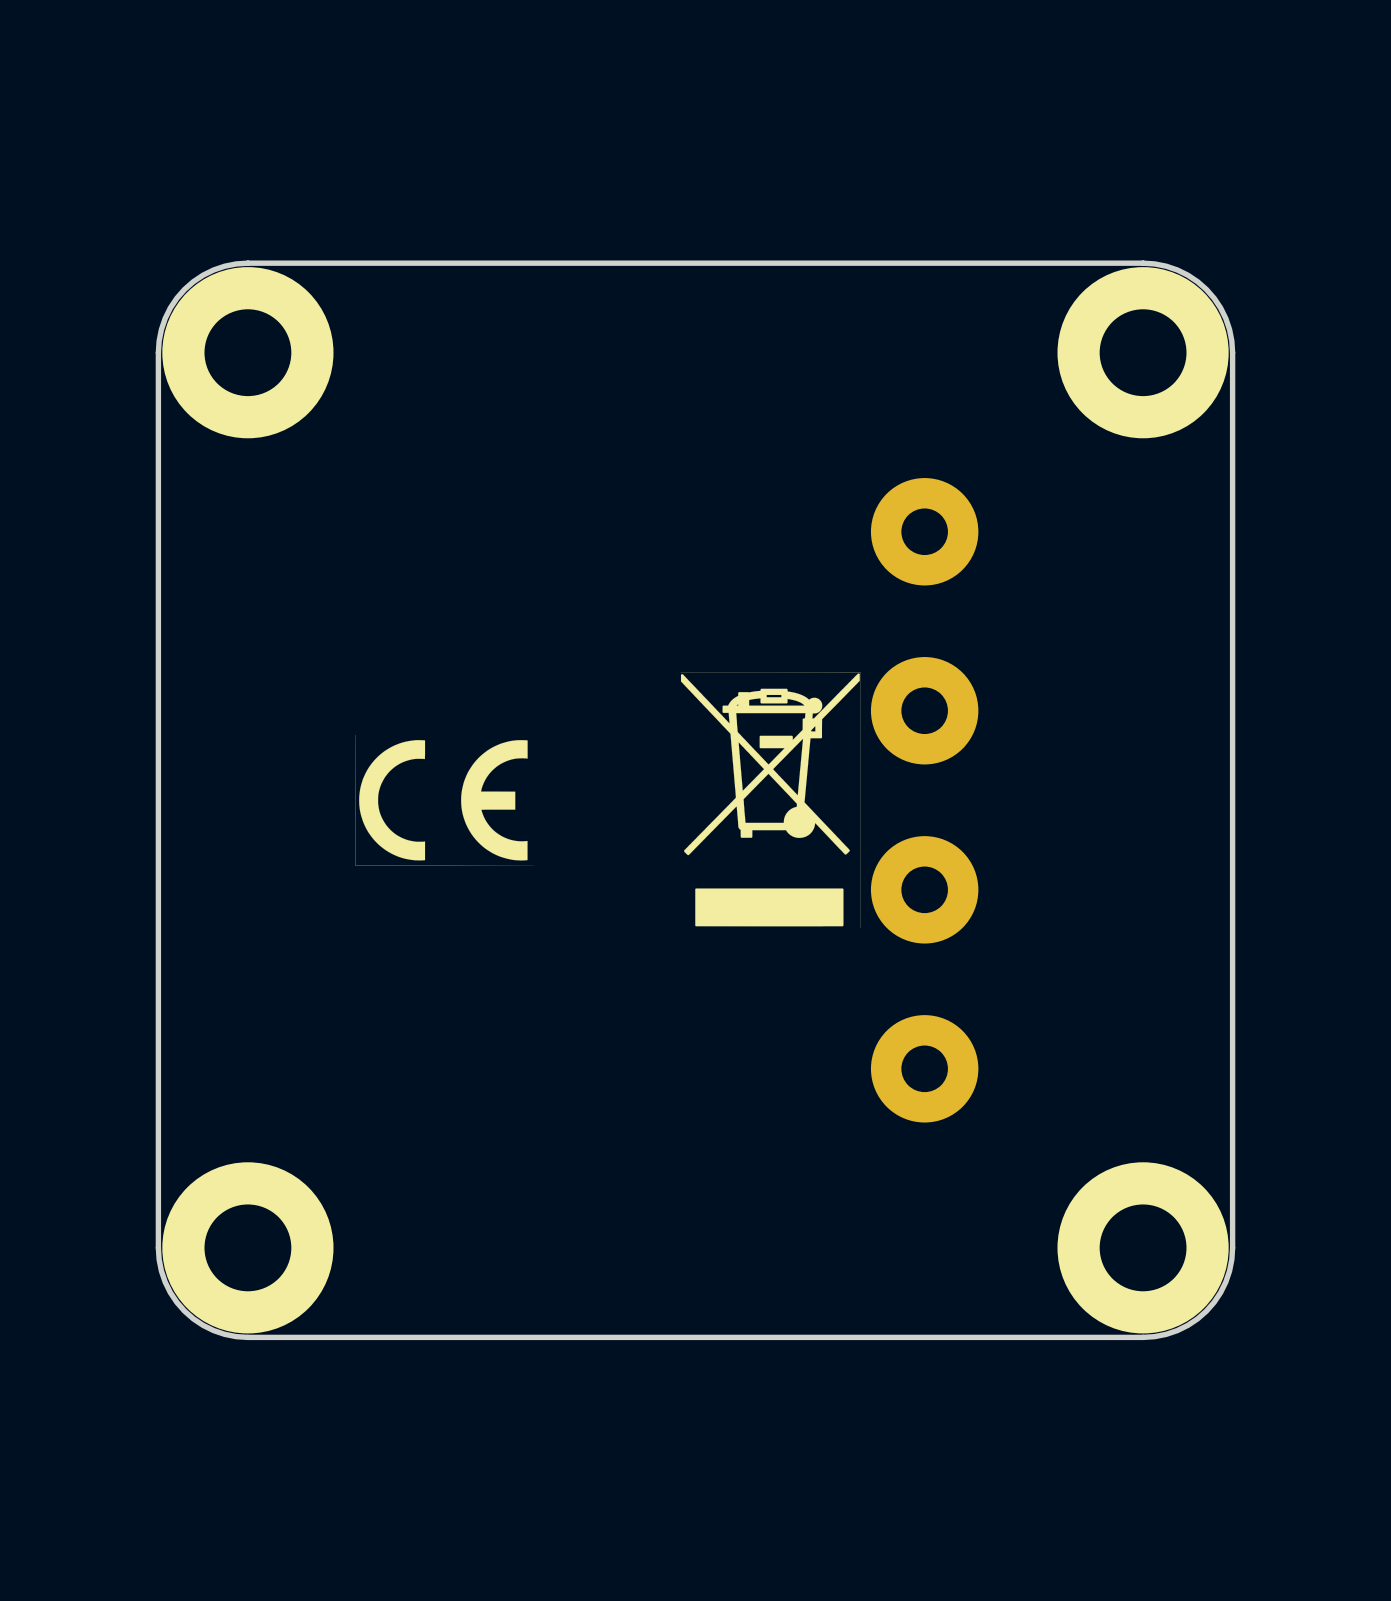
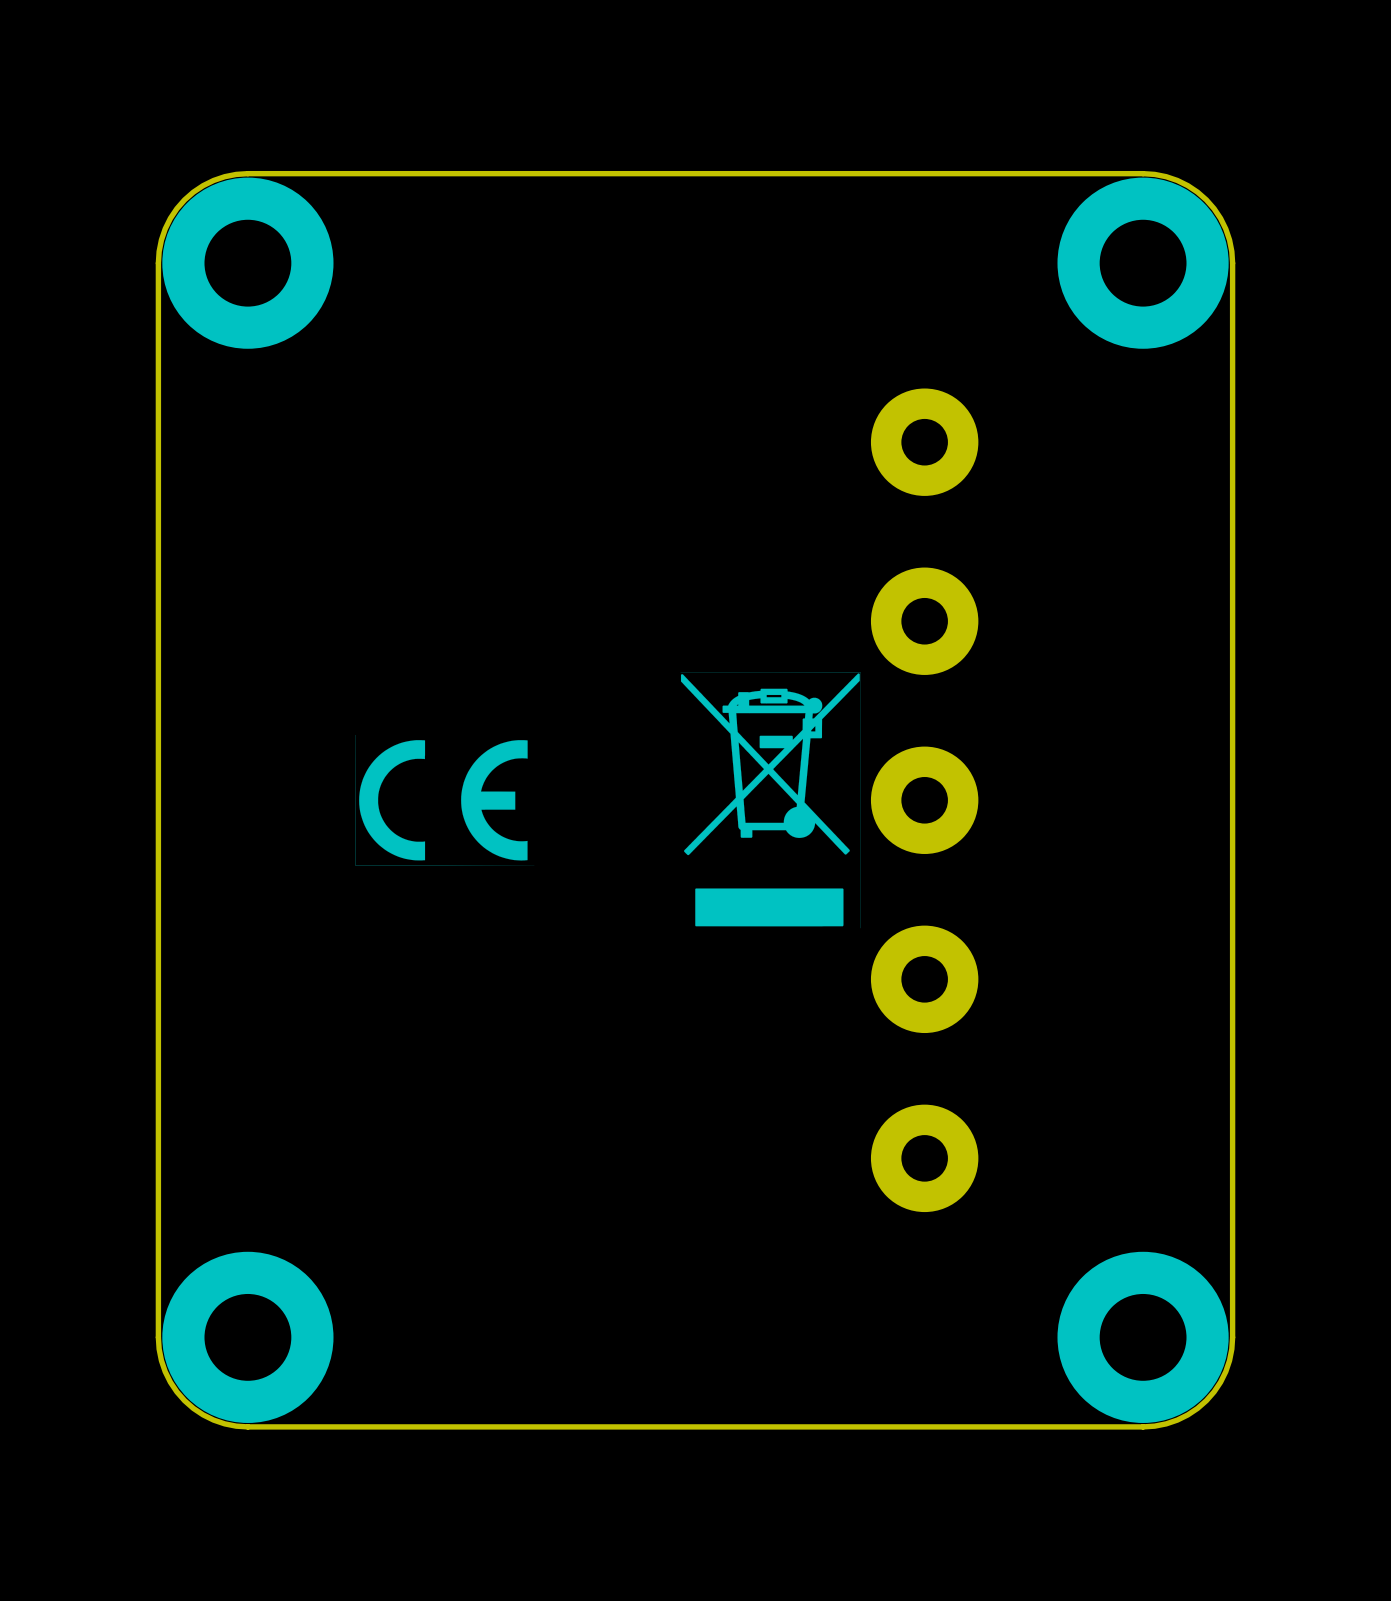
part position: (247, 352) -> (247, 263)
part position: (1143, 352) -> (1143, 263)
board edge: (1232, 352) (1231, 341) (1225, 318) (1220, 307) (1206, 289) (1197, 281) (1177, 269) (1154, 263) (1143, 263) (236, 263) (213, 269) (203, 275) (193, 281) (176, 298) (170, 307) (161, 329) (158, 352) -> (1232, 352) (1231, 251) (1229, 240) (1220, 218) (1206, 199) (1187, 185) (1166, 176) (1143, 173) (236, 174) (213, 180) (193, 192) (176, 208) (165, 228) (159, 251) (158, 263) (158, 352)
part: (924, 621) -> none
part: none -> (924, 800)
part: (924, 979) -> none
part position: (247, 1247) -> (247, 1337)
part position: (1143, 1247) -> (1143, 1337)
board edge: (1232, 1247) (1231, 1259) (1225, 1282) (1220, 1292) (1206, 1311) (1197, 1318) (1177, 1330) (1154, 1336) (1143, 1337) (236, 1336) (213, 1330) (193, 1318) (184, 1311) (170, 1292) (165, 1282) (159, 1259) (158, 1247) -> (1232, 1247) (1231, 1349) (1229, 1360) (1220, 1382) (1206, 1400) (1187, 1414) (1166, 1423) (1143, 1426) (236, 1426) (213, 1420) (193, 1408) (176, 1391) (165, 1371) (159, 1349) (158, 1337) (158, 1247)

